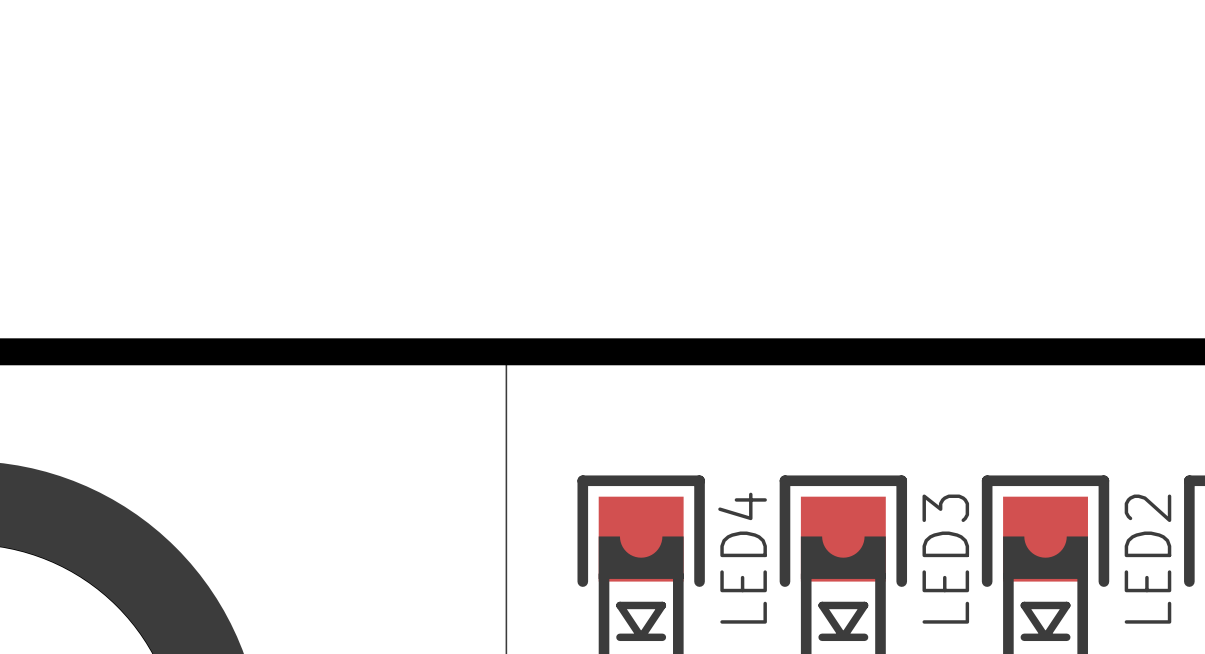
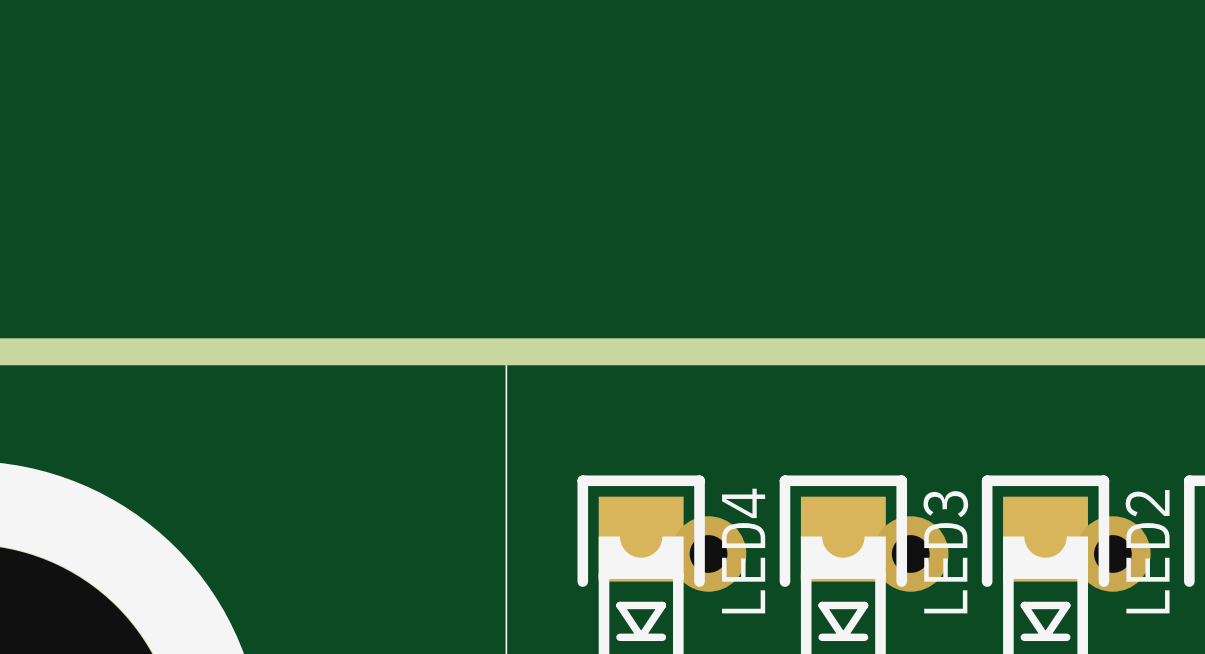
via: none -> (708, 553)
via: none -> (910, 553)
via: none -> (1112, 553)

